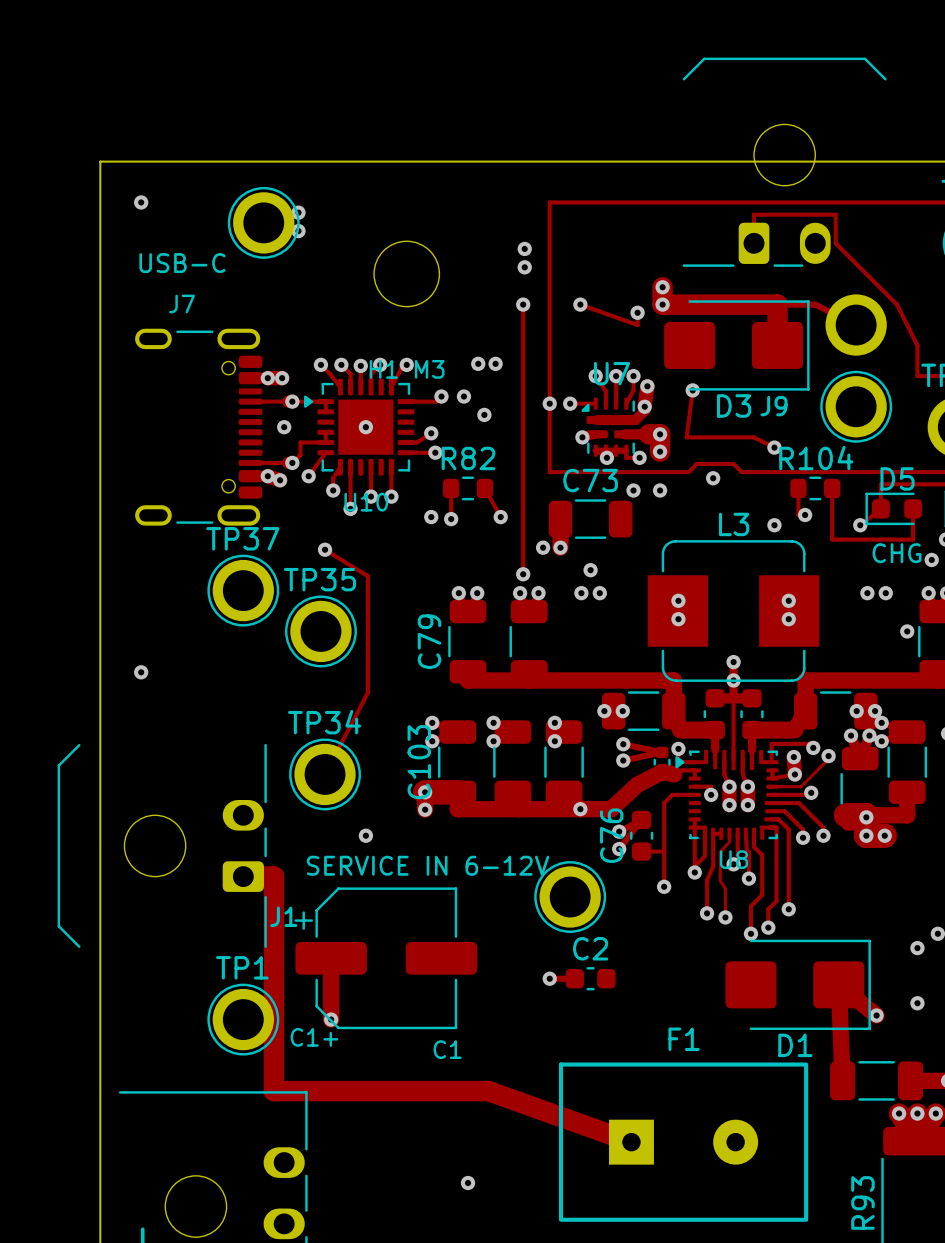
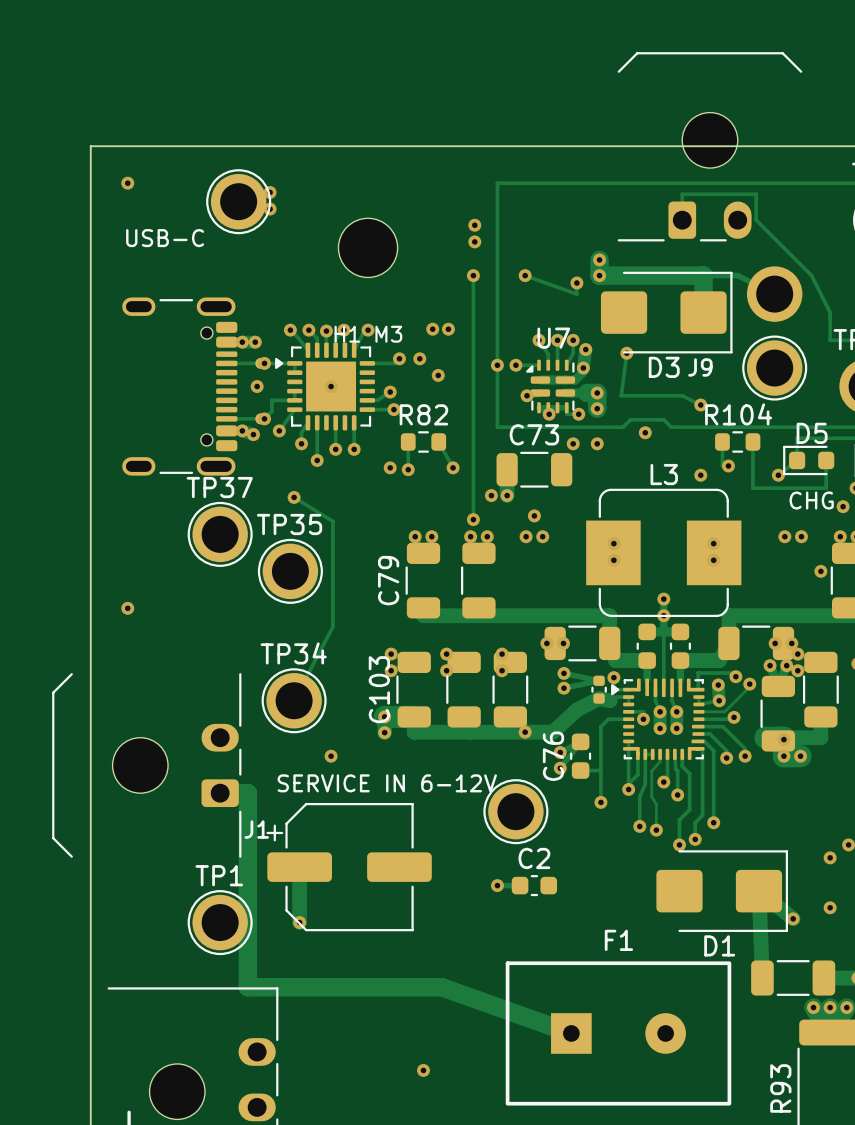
J7 name: J7 (182, 304) -> none
U10 name: U10 (366, 502) -> none
U8 name: U8 (733, 859) -> none
text: C1+ (314, 1037) -> none
C1 name: C1 (447, 1049) -> none

